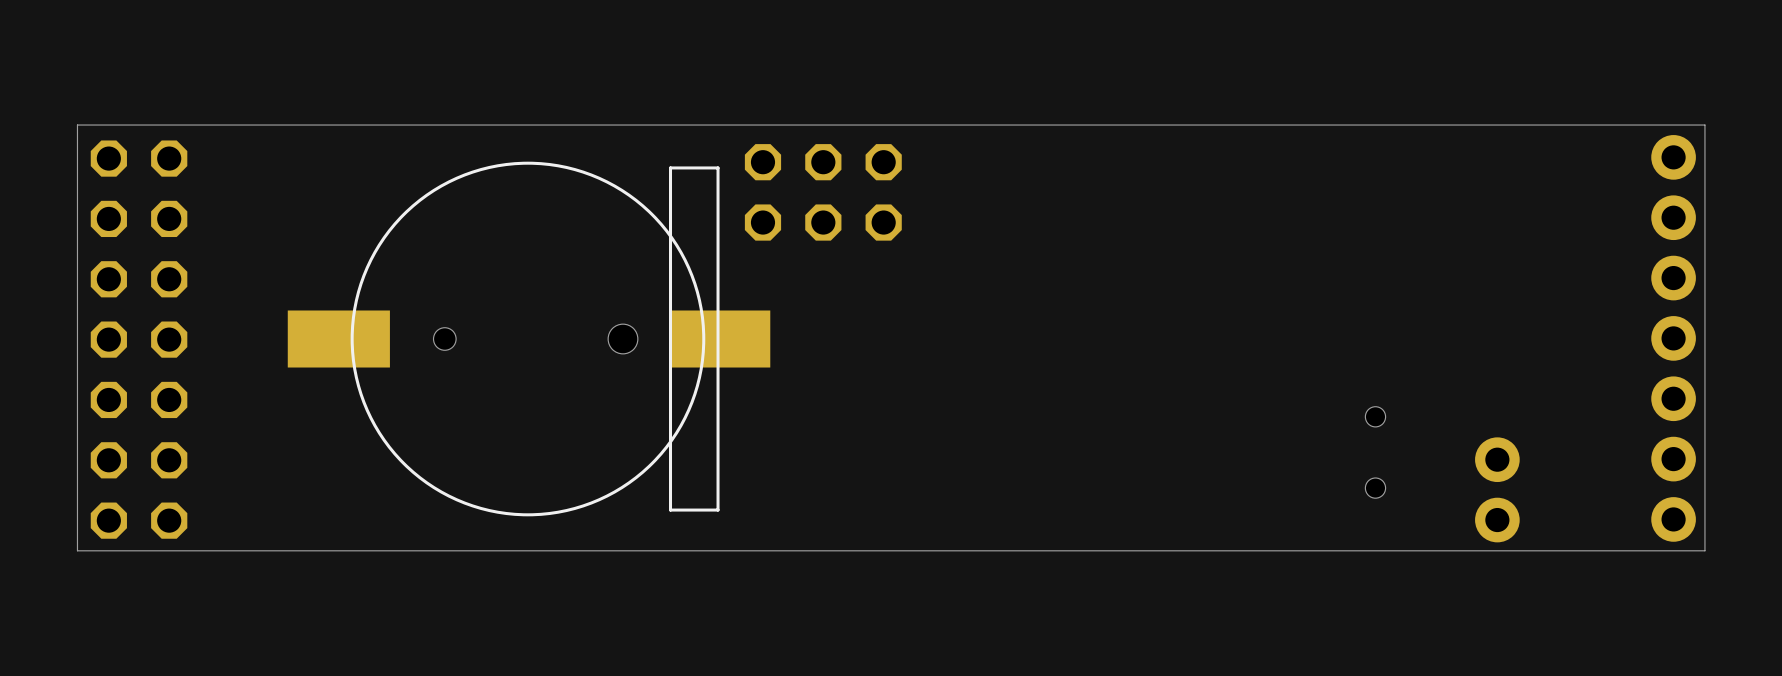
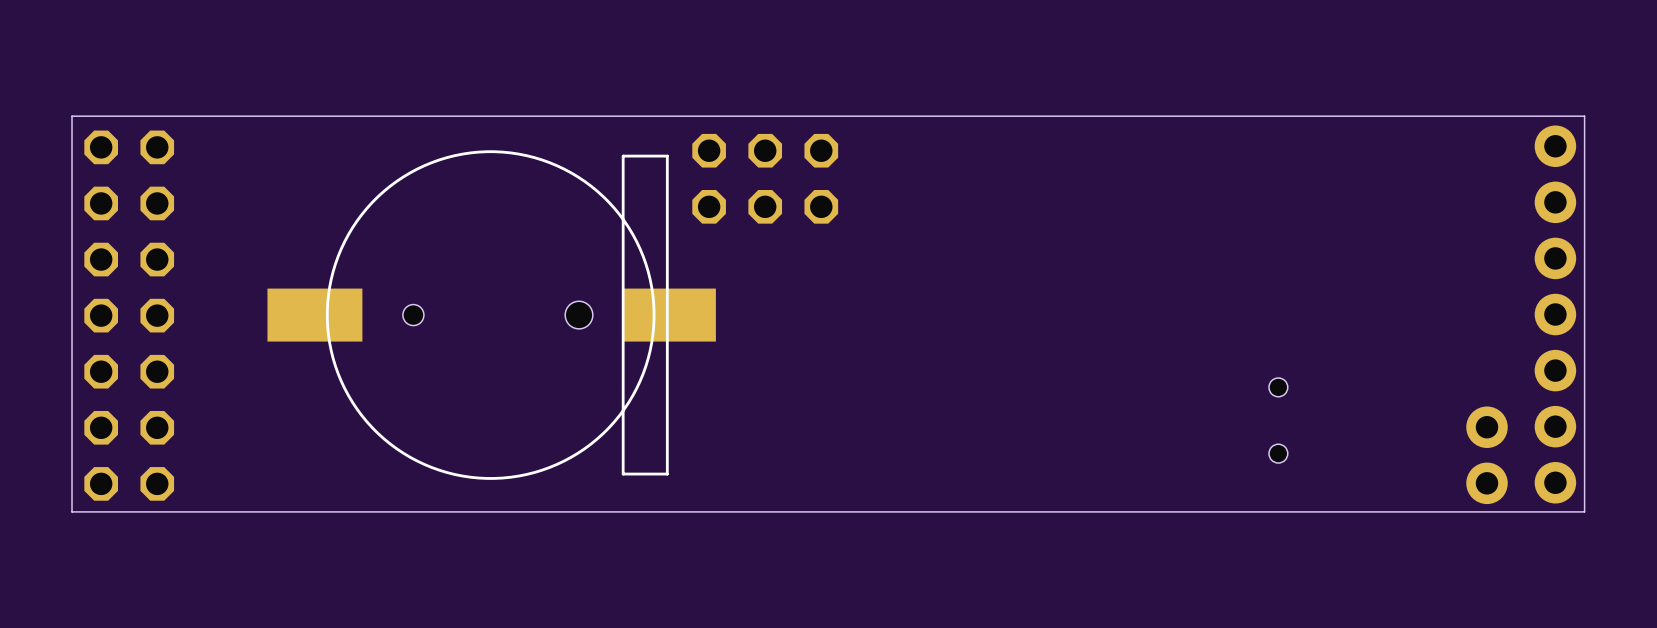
part position: (1497, 489) -> (1487, 455)

